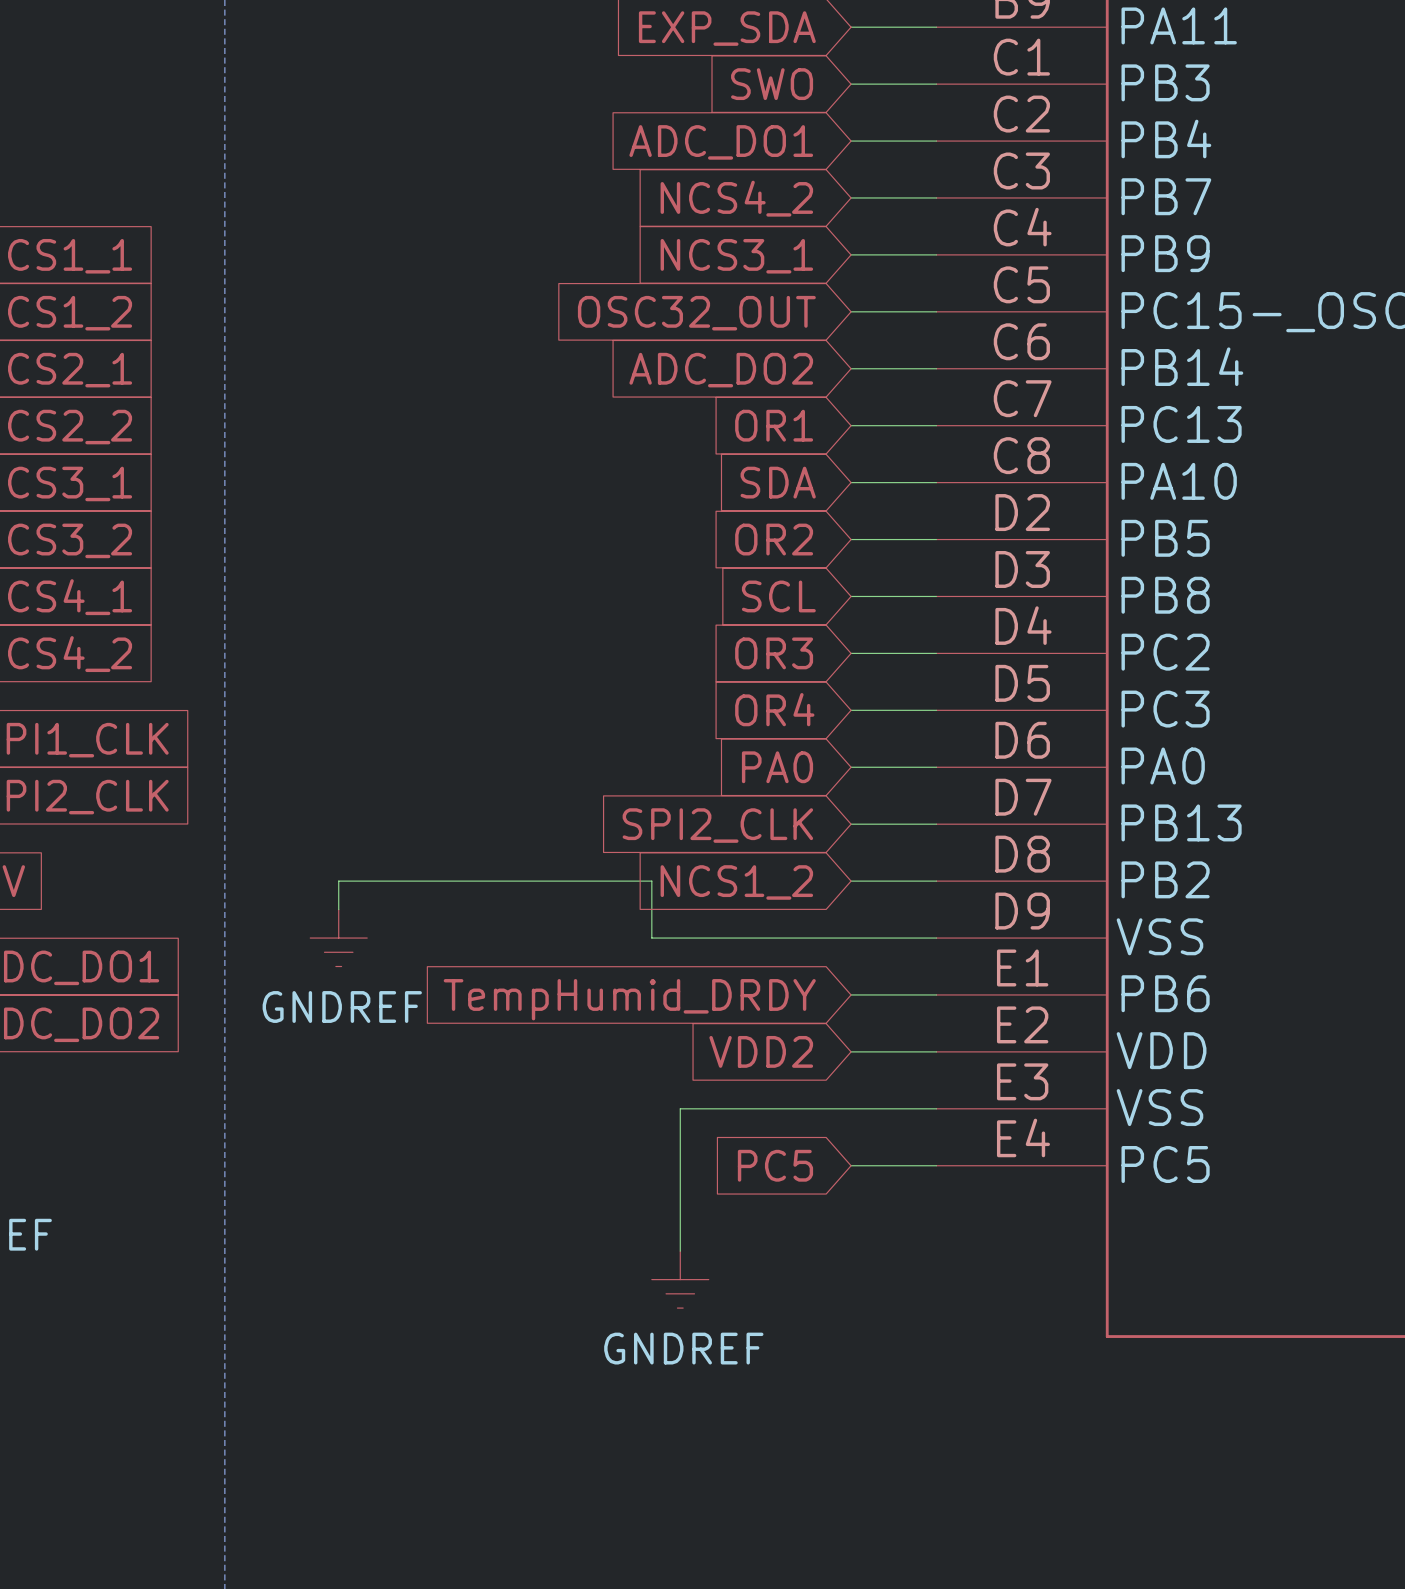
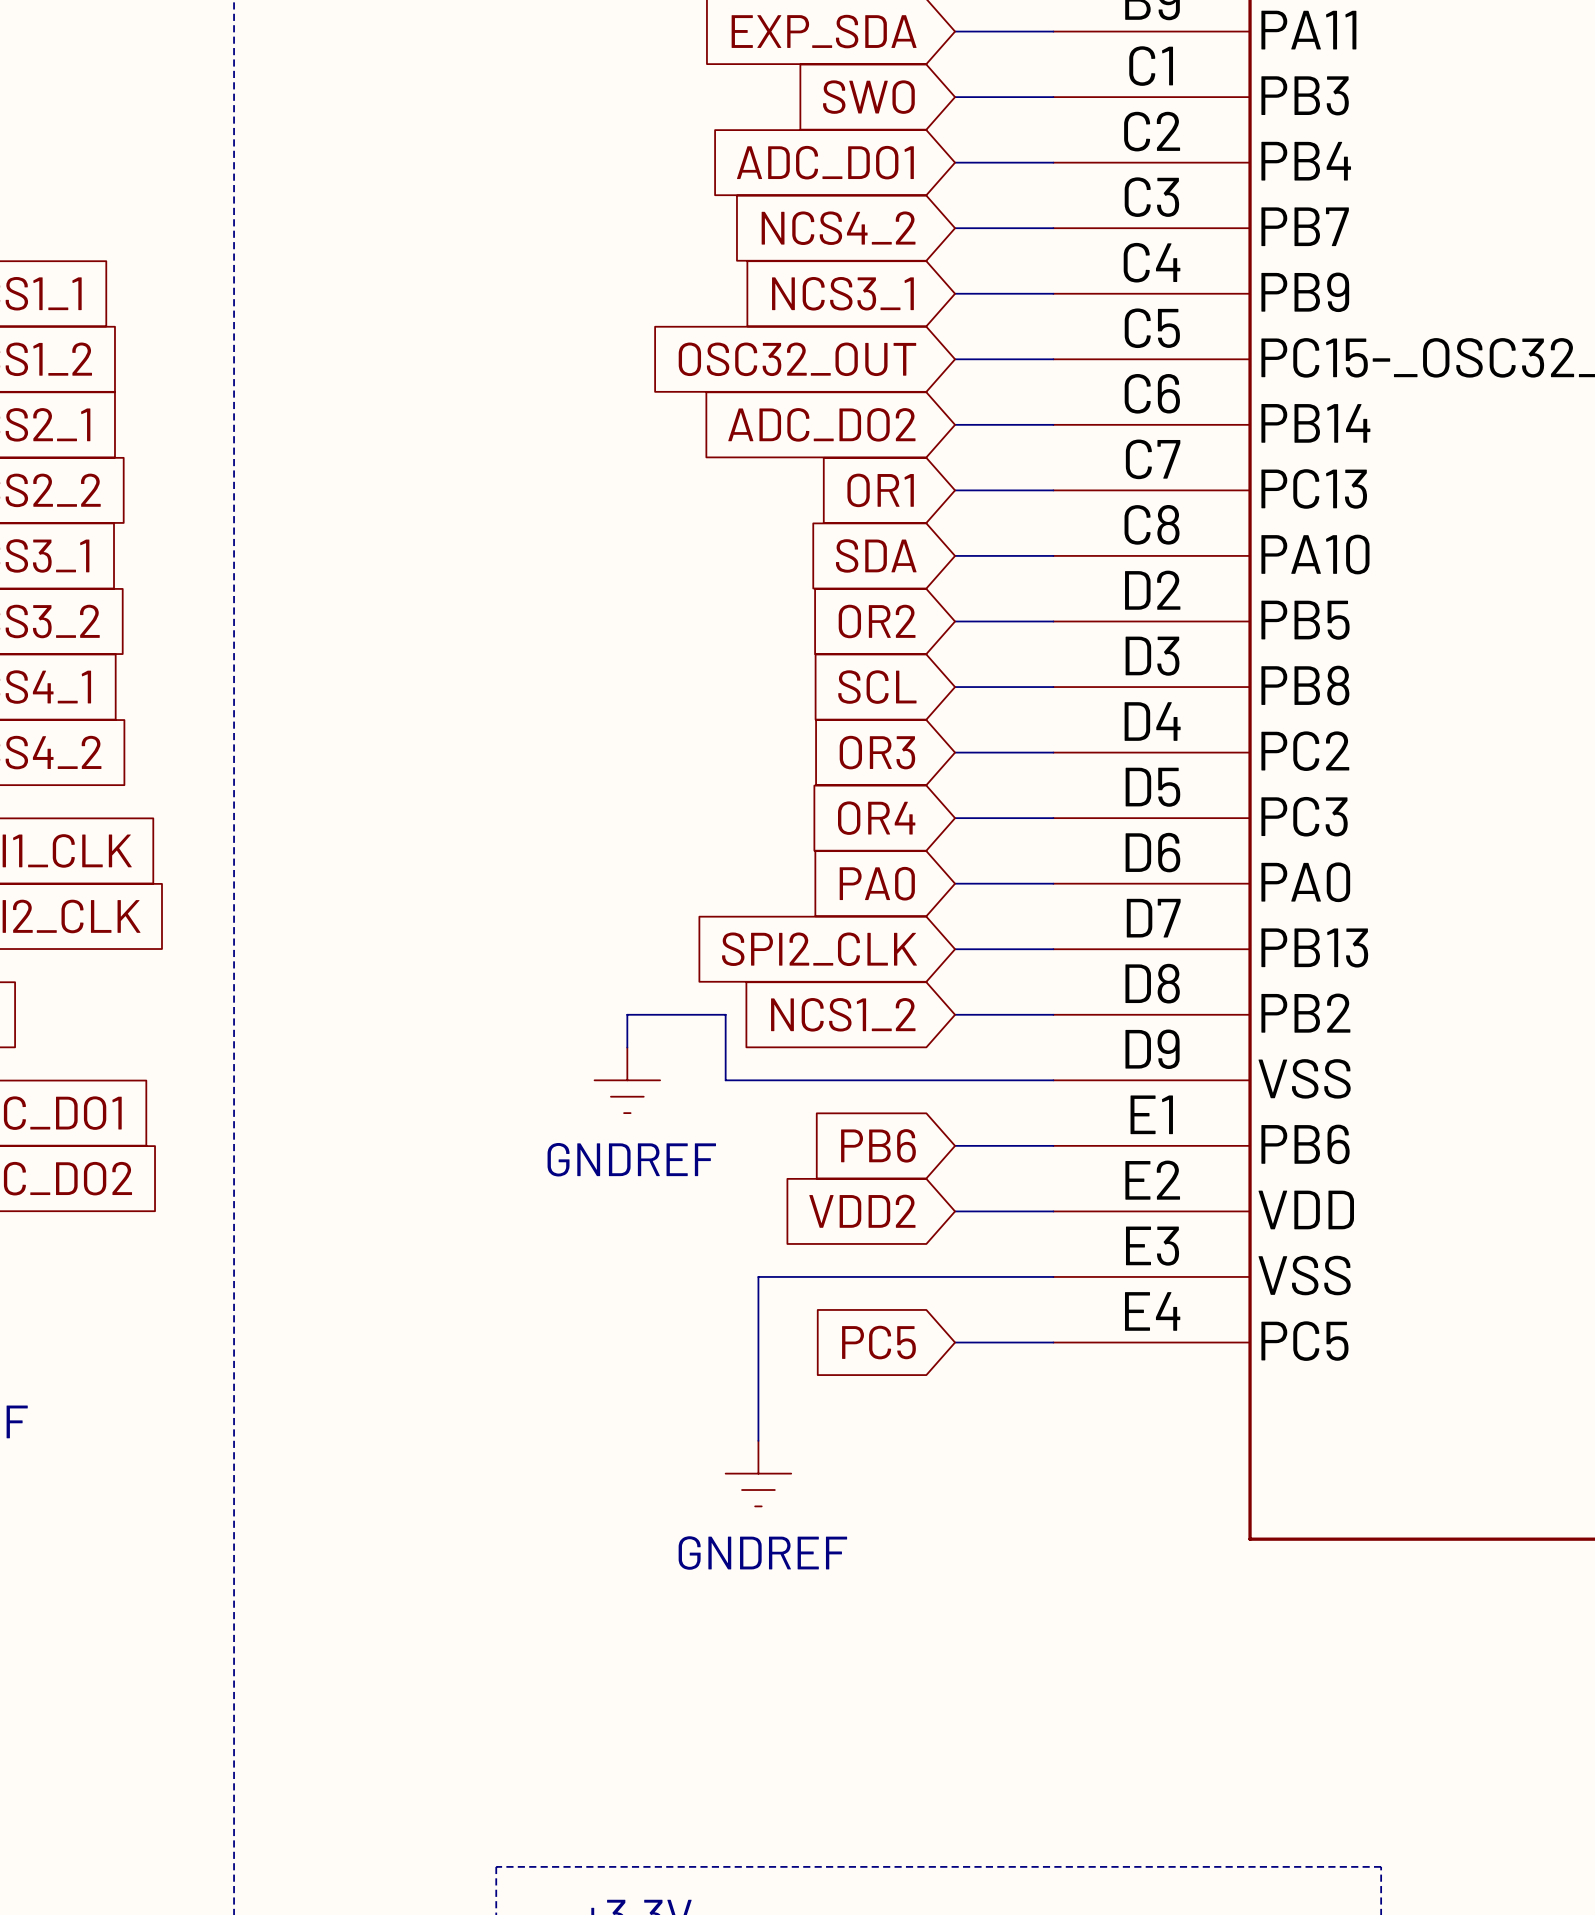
wire: (566, 881) (338, 881) (338, 909) -> (627, 1014) (627, 1047)
power symbol position: GNDREF (338, 938) -> GNDREF (627, 1080)
global label: TempHumid_DRDY (629, 999) -> PB6 (878, 1145)

